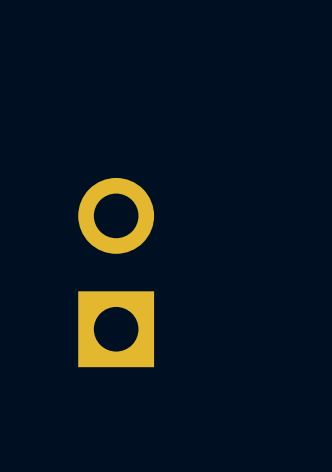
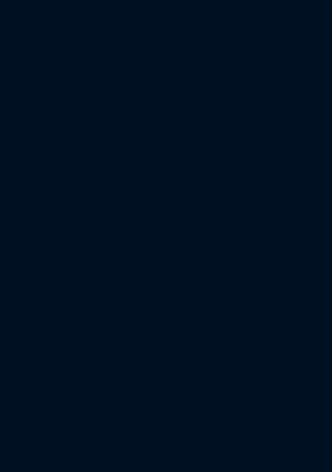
part: (116, 272) -> none

